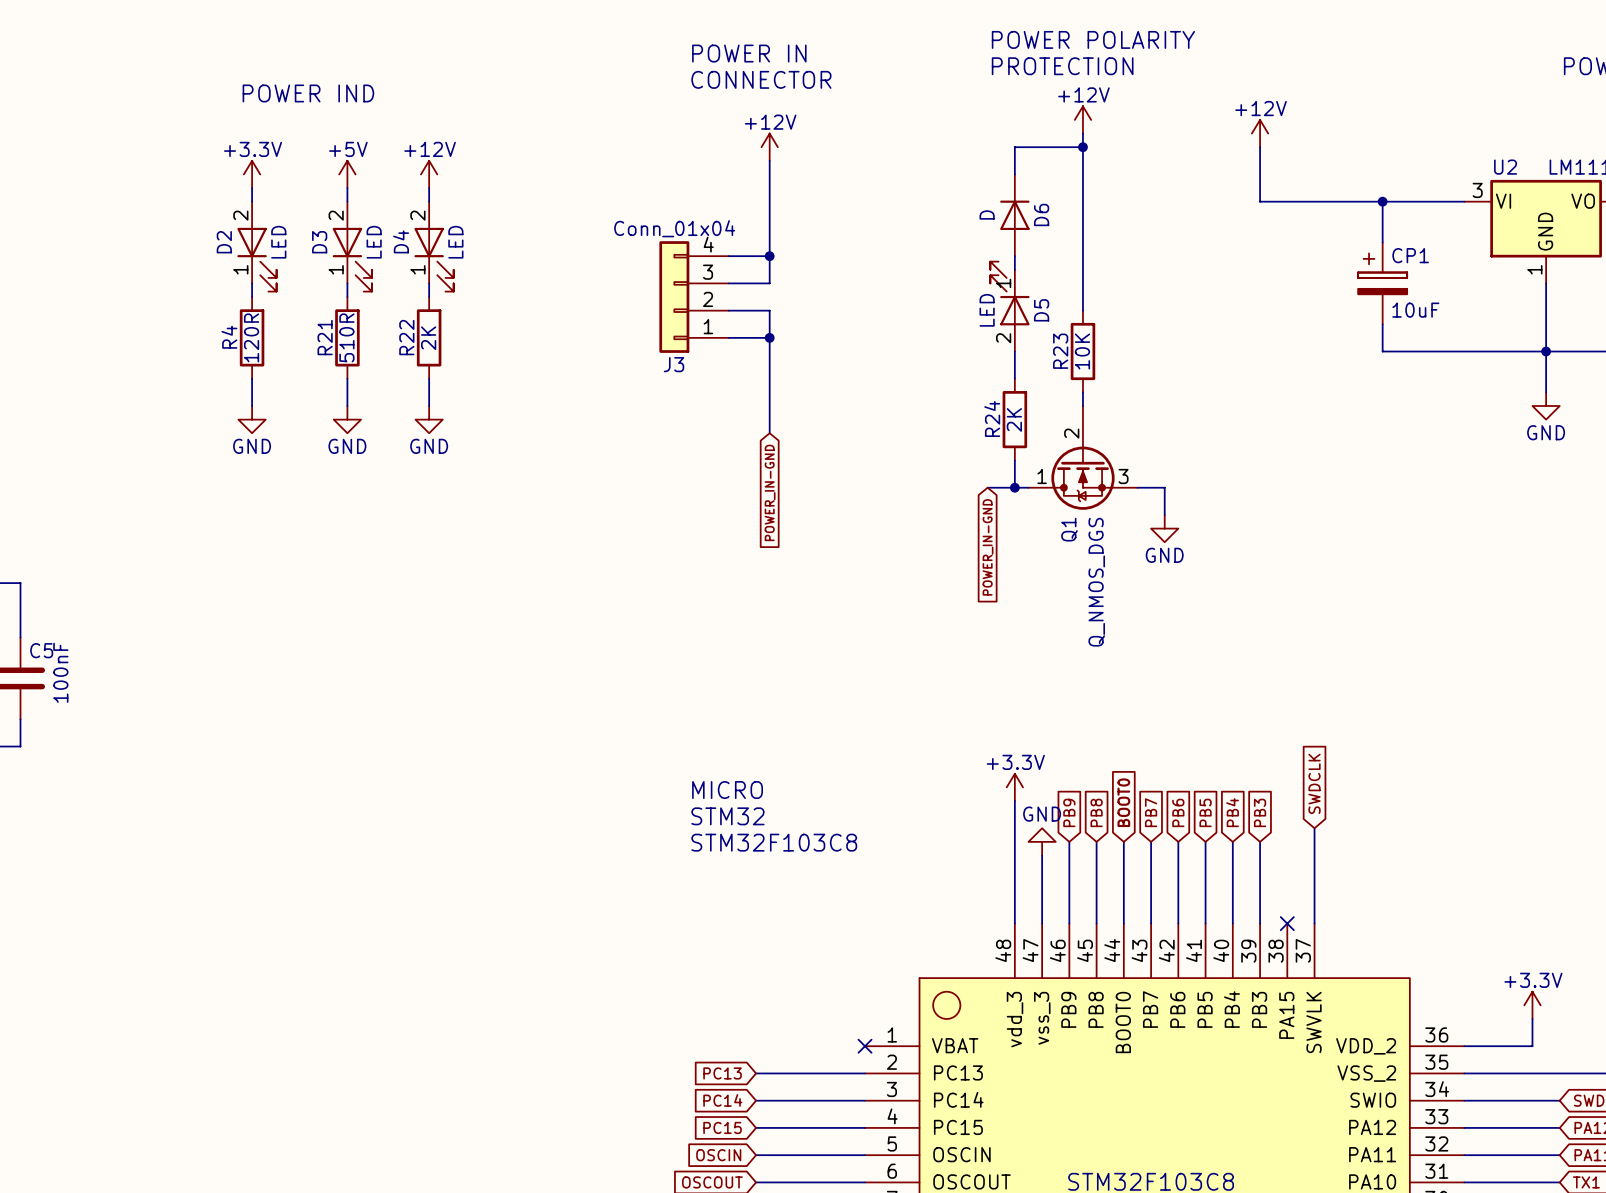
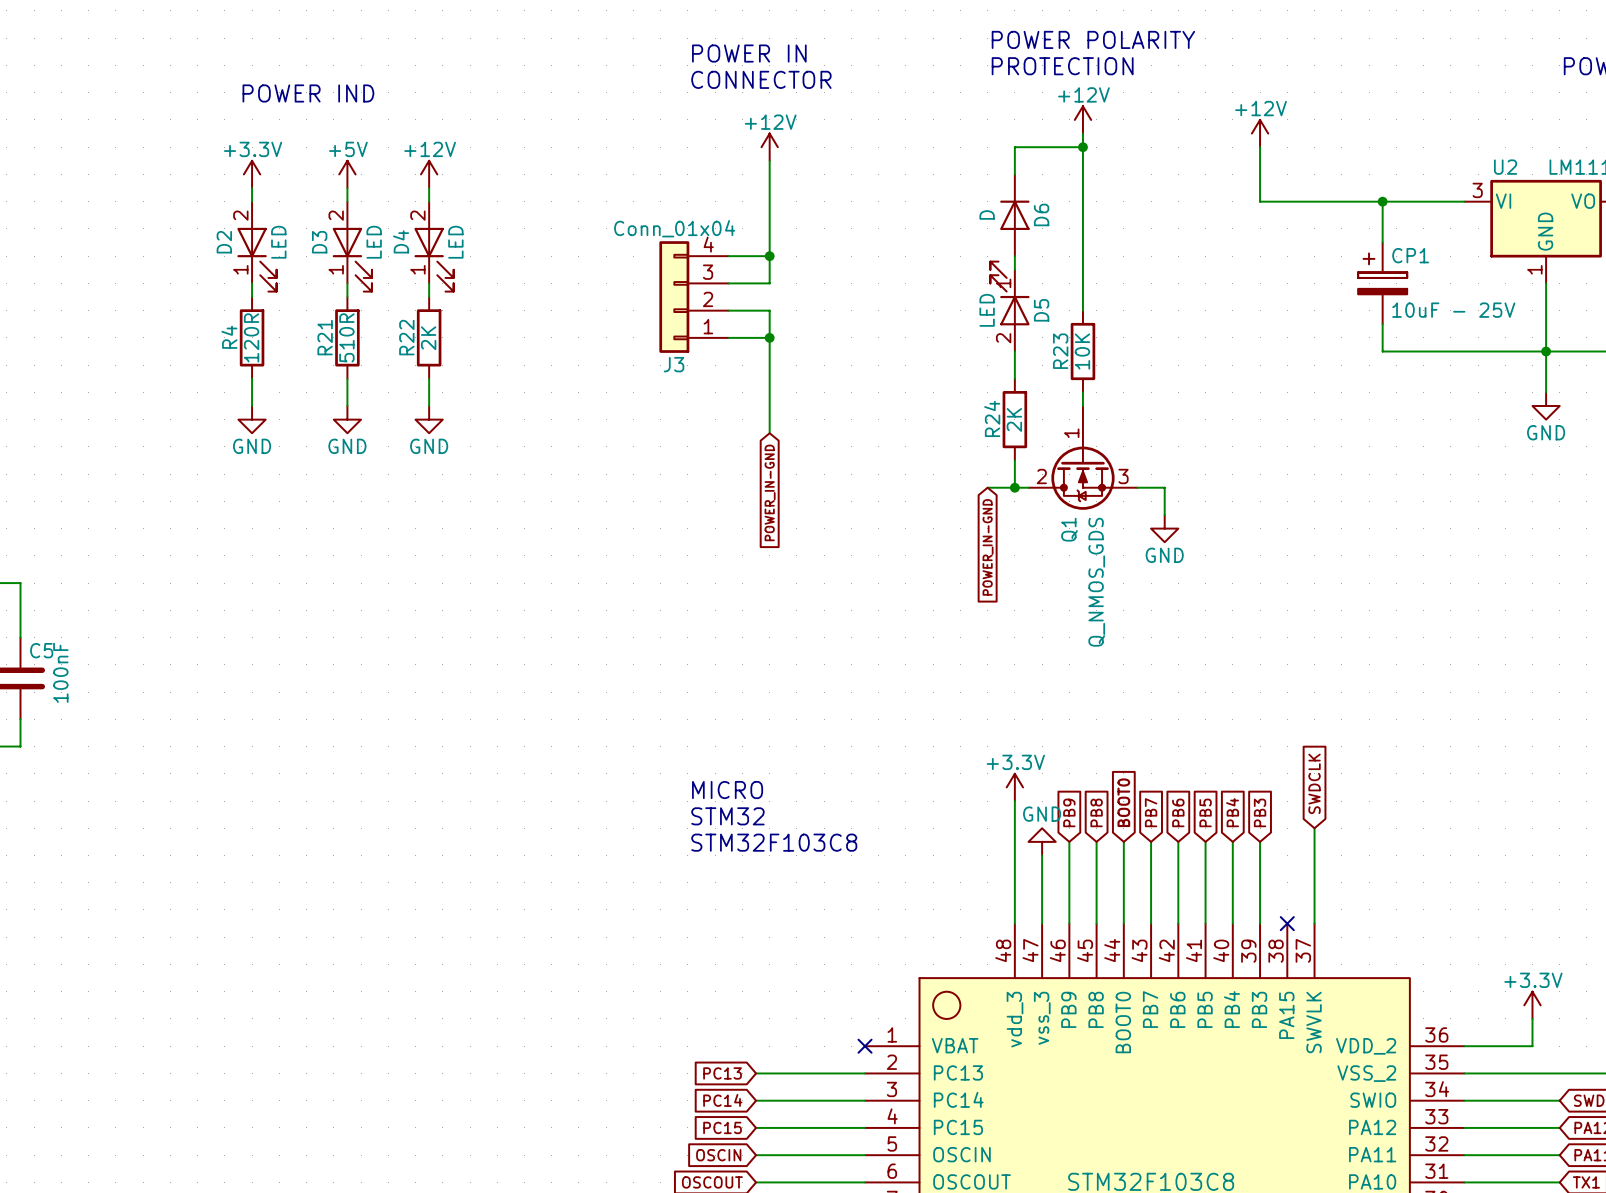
CP1 value: 10uF (1415, 310) -> 10uF - 25V (1453, 310)
Q1 pin number: 2 (1071, 433) -> 1 (1071, 433)
Q1 pin number: 1 (1042, 476) -> 2 (1041, 476)
Q1 value: Q_NMOS_DGS (1096, 582) -> Q_NMOS_GDS (1096, 582)

